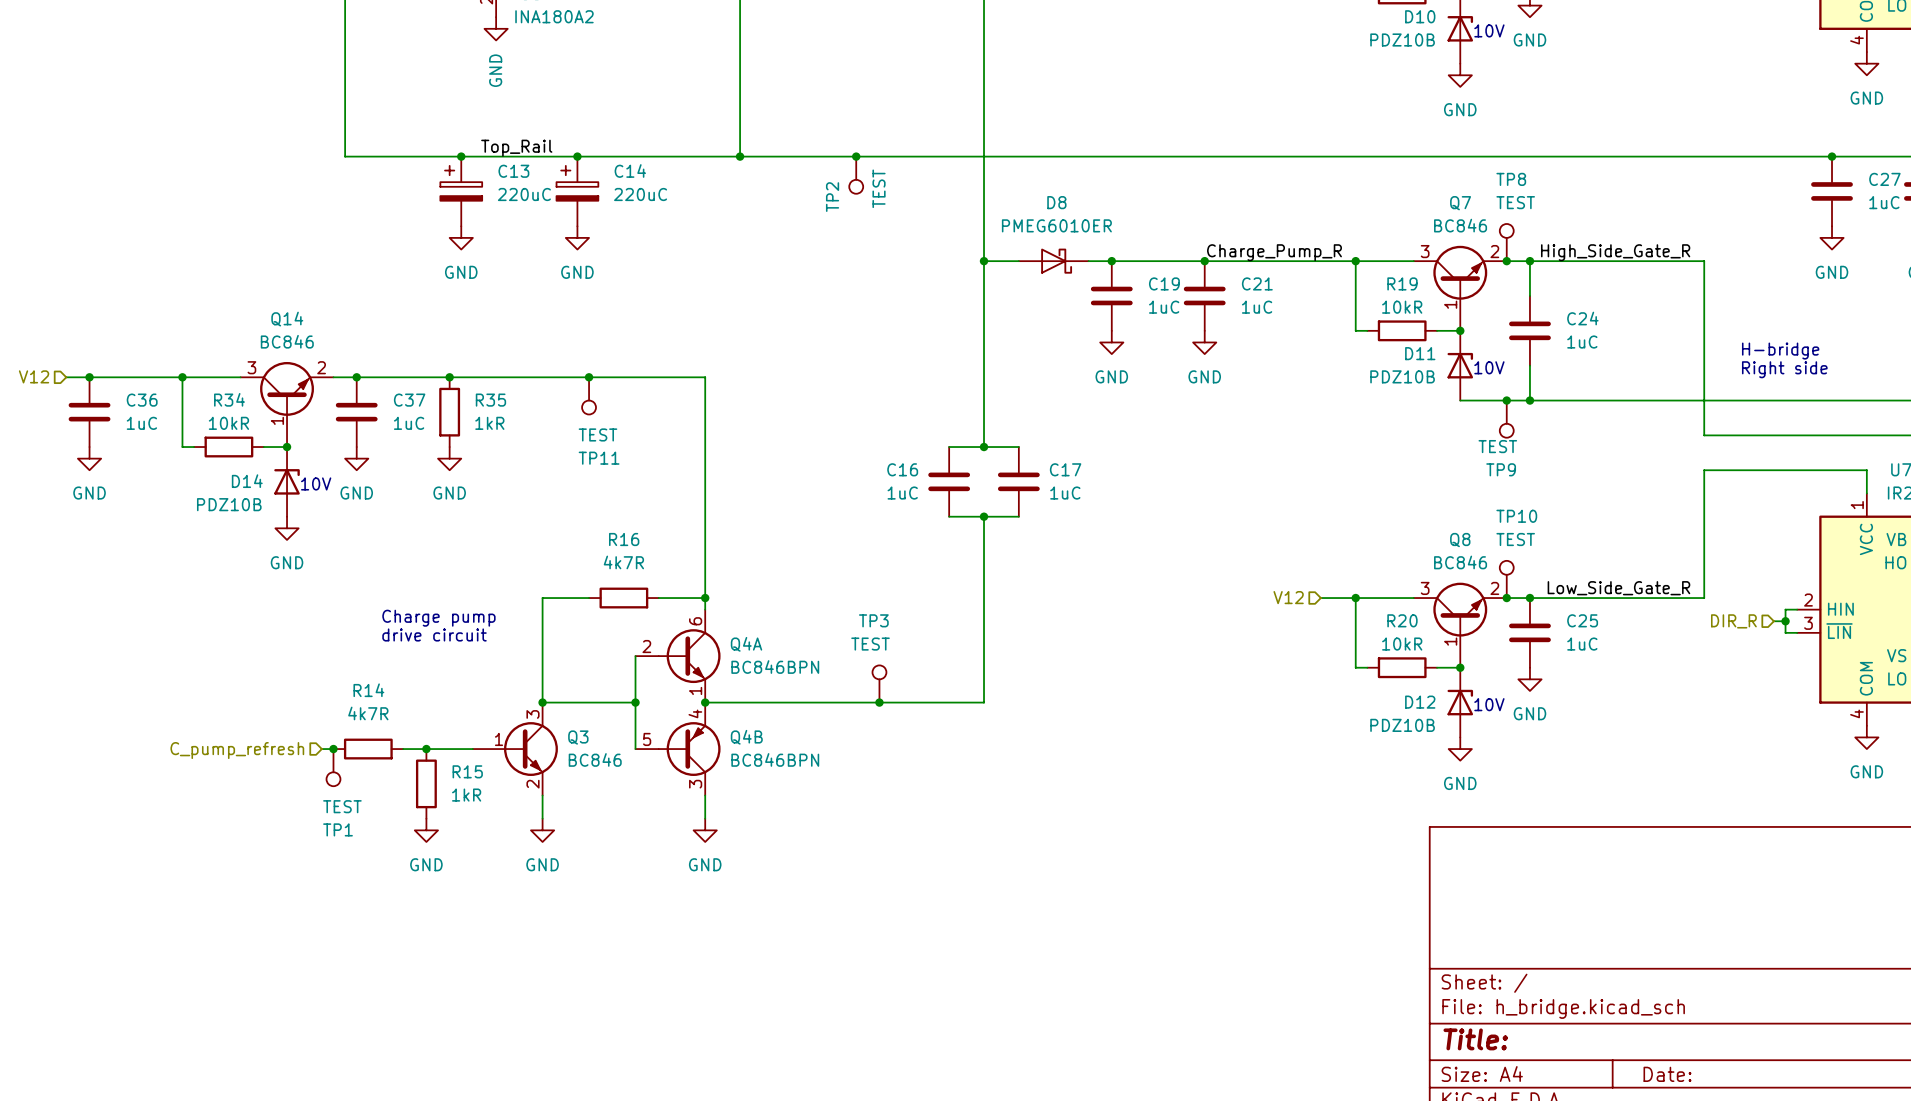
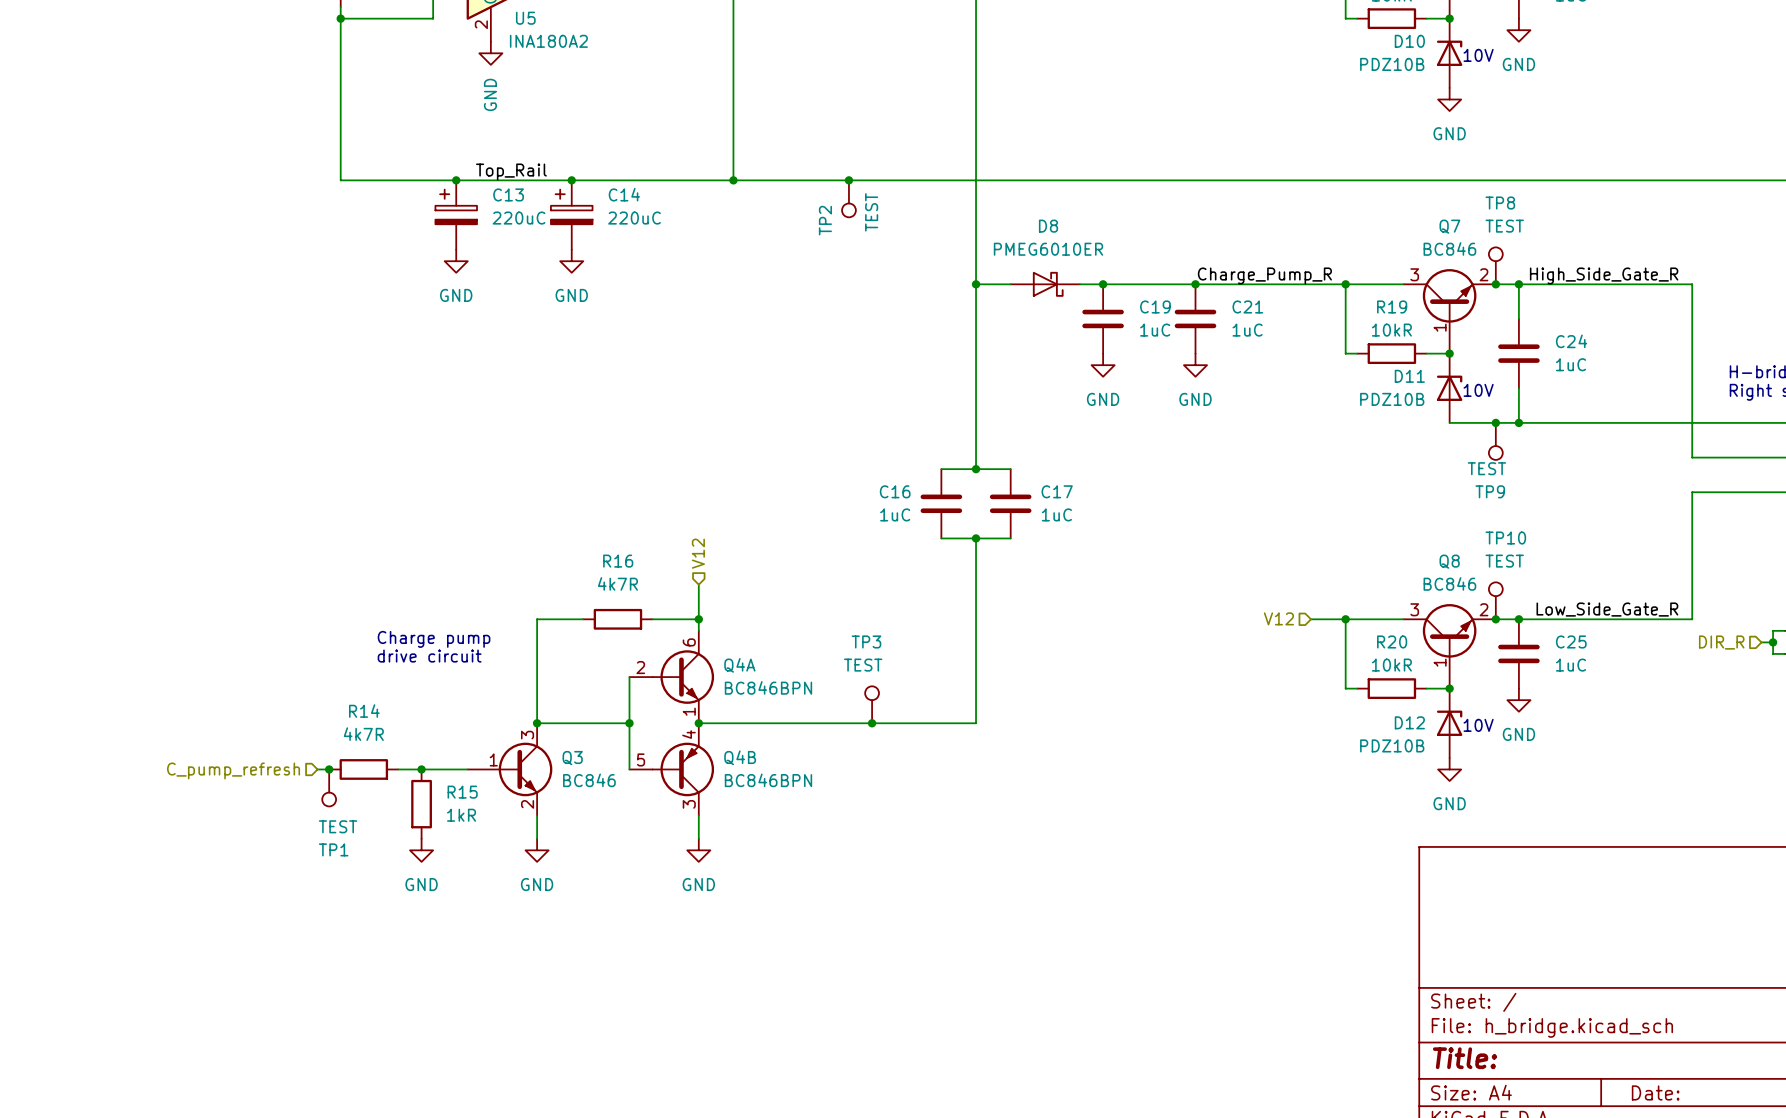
hierarchical label: V12 (34, 376) -> none
wire: (66, 377) (240, 377) -> none
junction: (89, 377) -> none
wire: (182, 377) (182, 447) (194, 447) -> none
junction: (182, 377) -> none
wire: (333, 377) (705, 377) (705, 563) -> none
junction: (356, 377) -> none
junction: (449, 377) -> none
junction: (589, 377) -> none
TP11: TEST (589, 395) -> none
Q14: BC846 (287, 404) -> none
C36: 1uC (89, 412) -> none
C37: 1uC (356, 412) -> none
R35: 1kR (449, 412) -> none
R34: 10kR (228, 447) -> none
wire: (263, 447) (287, 447) -> none
junction: (287, 447) -> none
power symbol: GND (89, 458) -> none
power symbol: GND (356, 458) -> none
power symbol: GND (449, 458) -> none
D14: PDZ10B (287, 481) -> none
text: 10V (316, 483) -> none
power symbol: GND (287, 528) -> none
hierarchical label: none -> V12 (698, 553)

